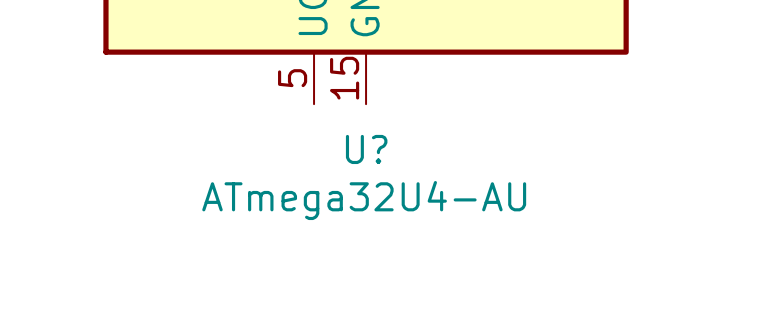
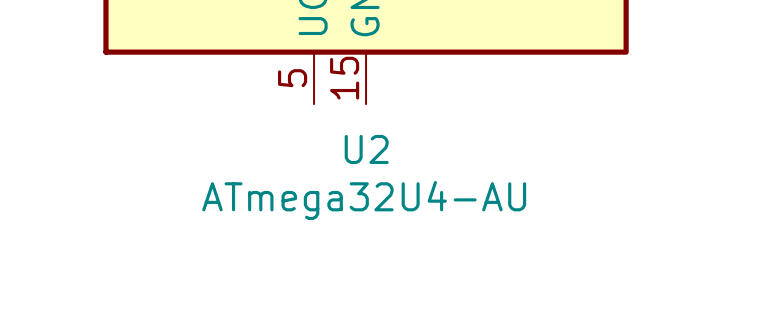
U? name: U? (366, 149) -> U2 (366, 149)

